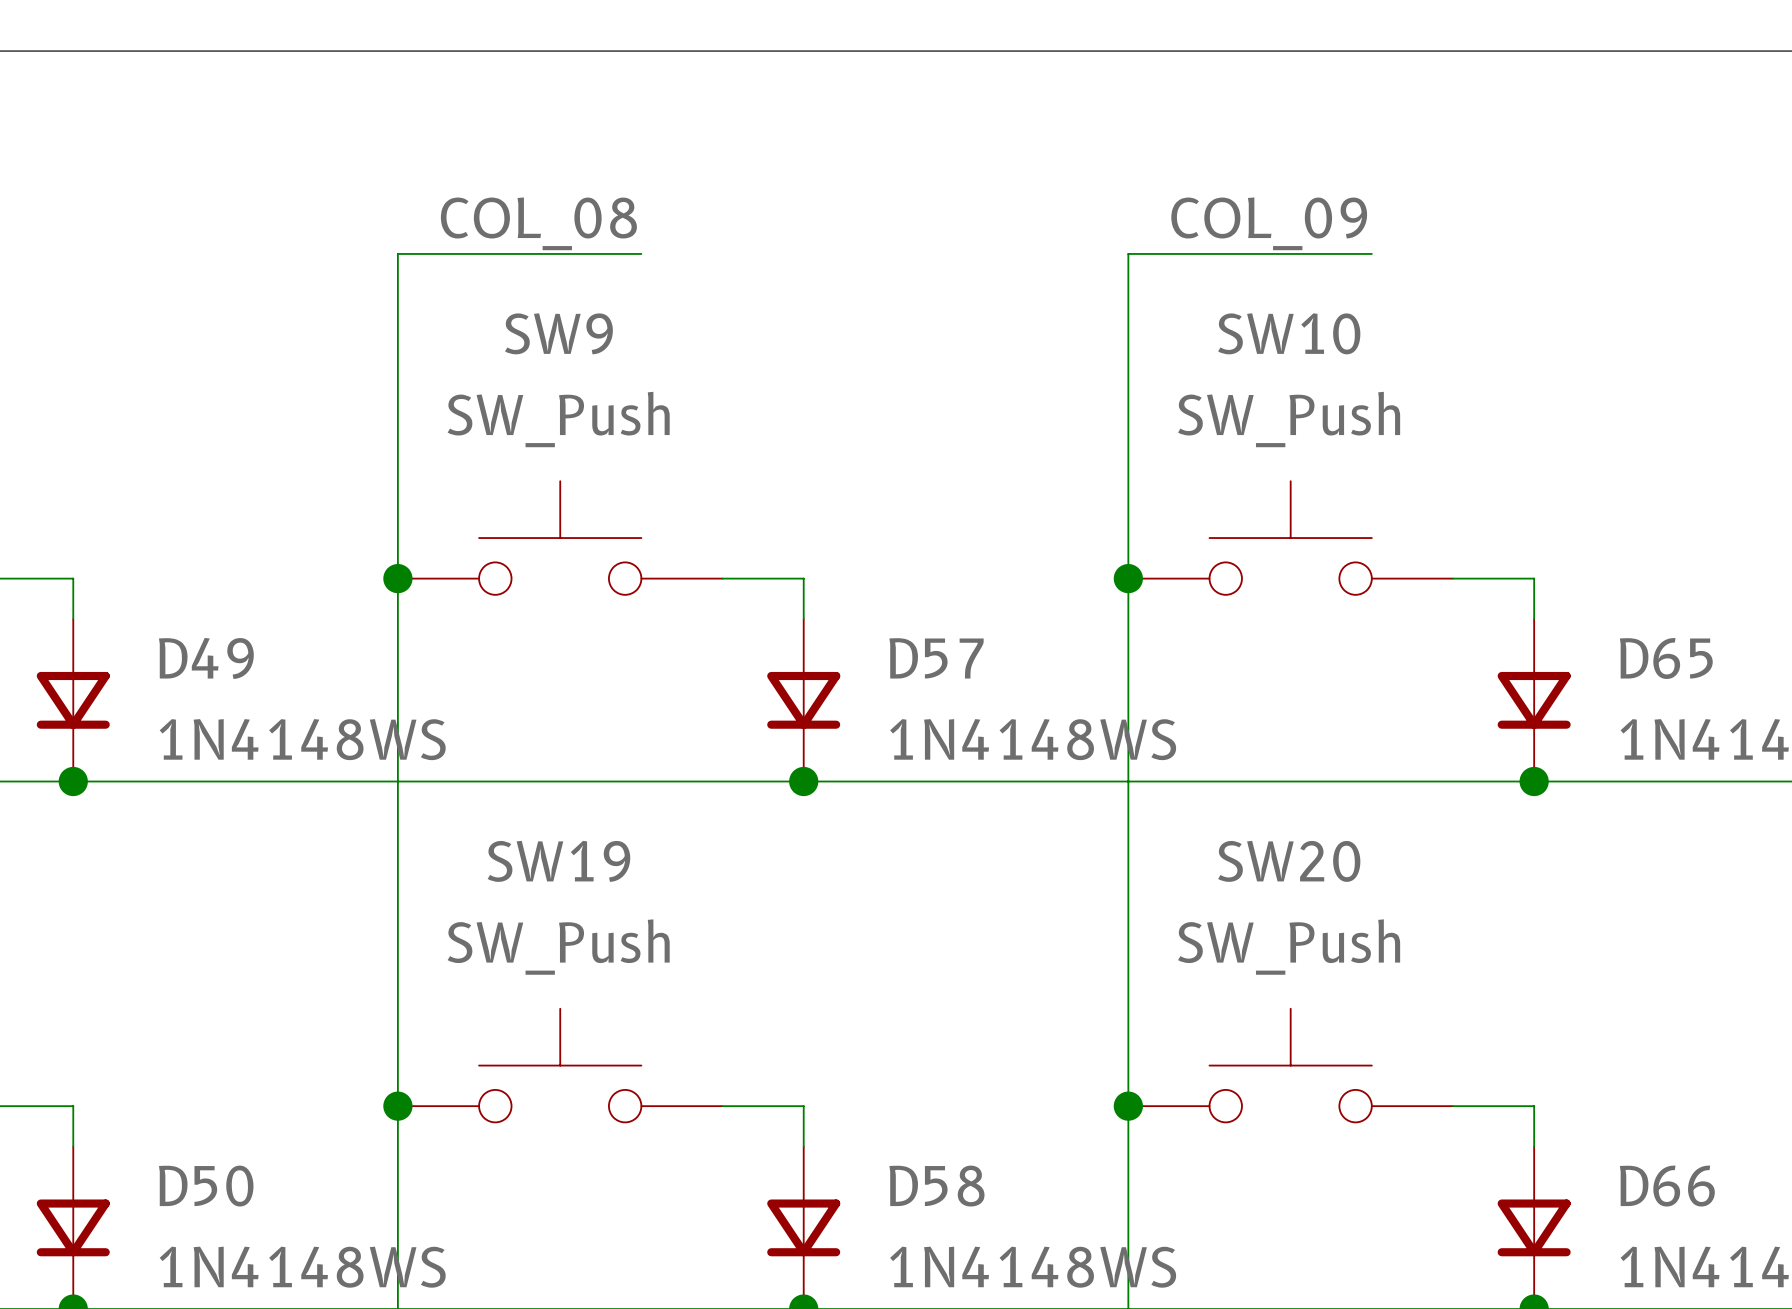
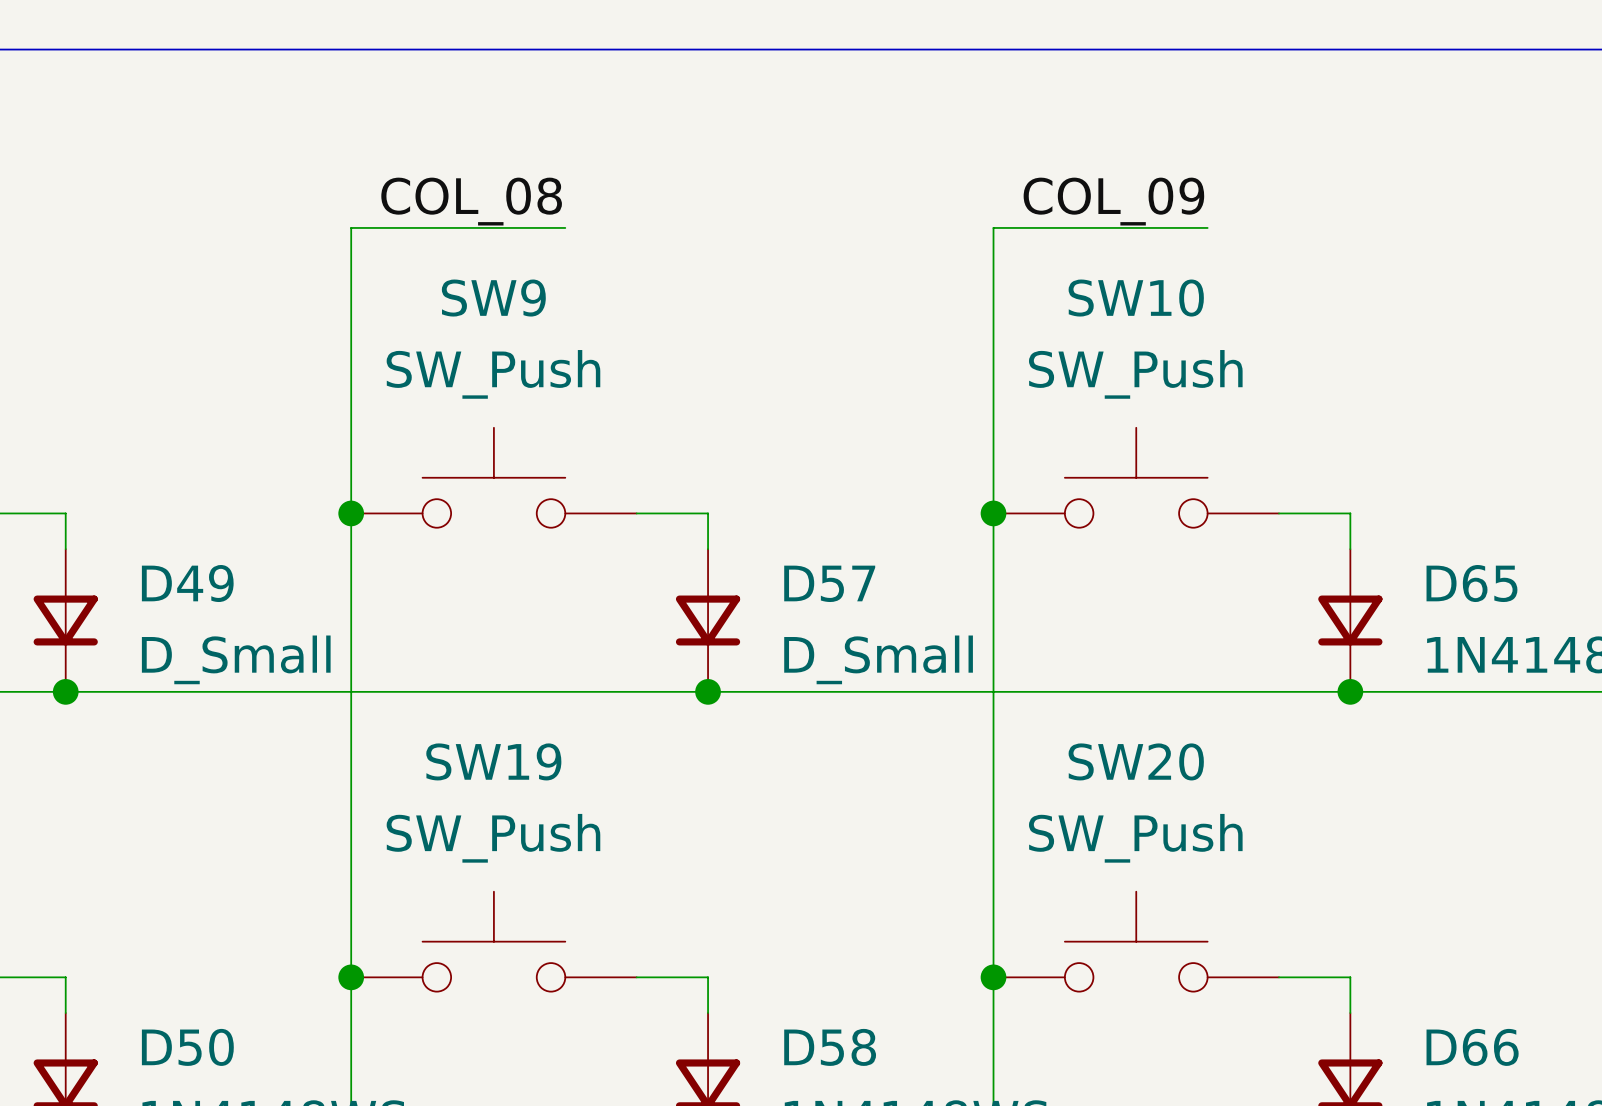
D49 value: 1N4148WS (302, 739) -> D_Small (236, 659)
D57 value: 1N4148WS (1033, 739) -> D_Small (878, 659)

